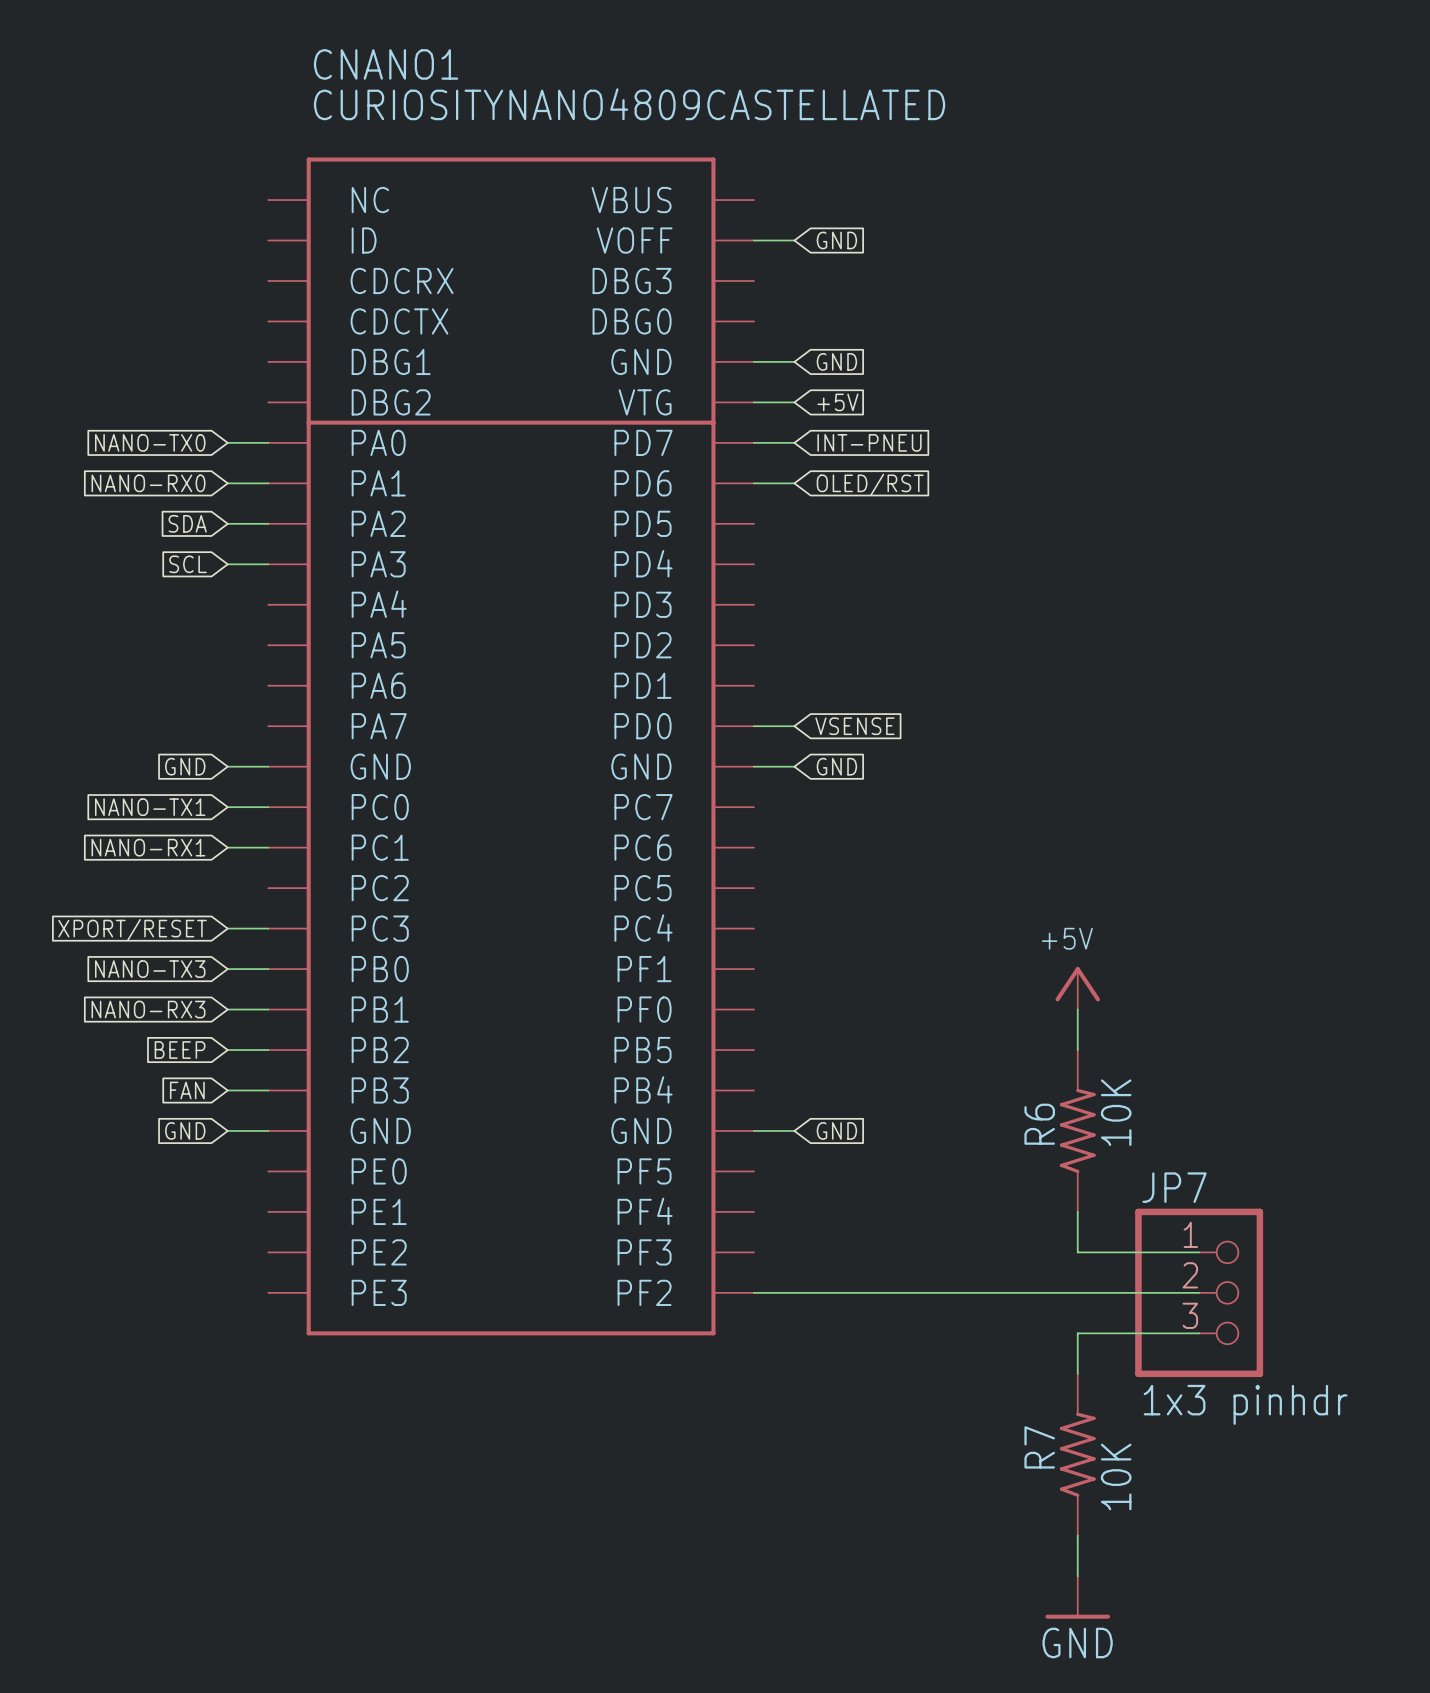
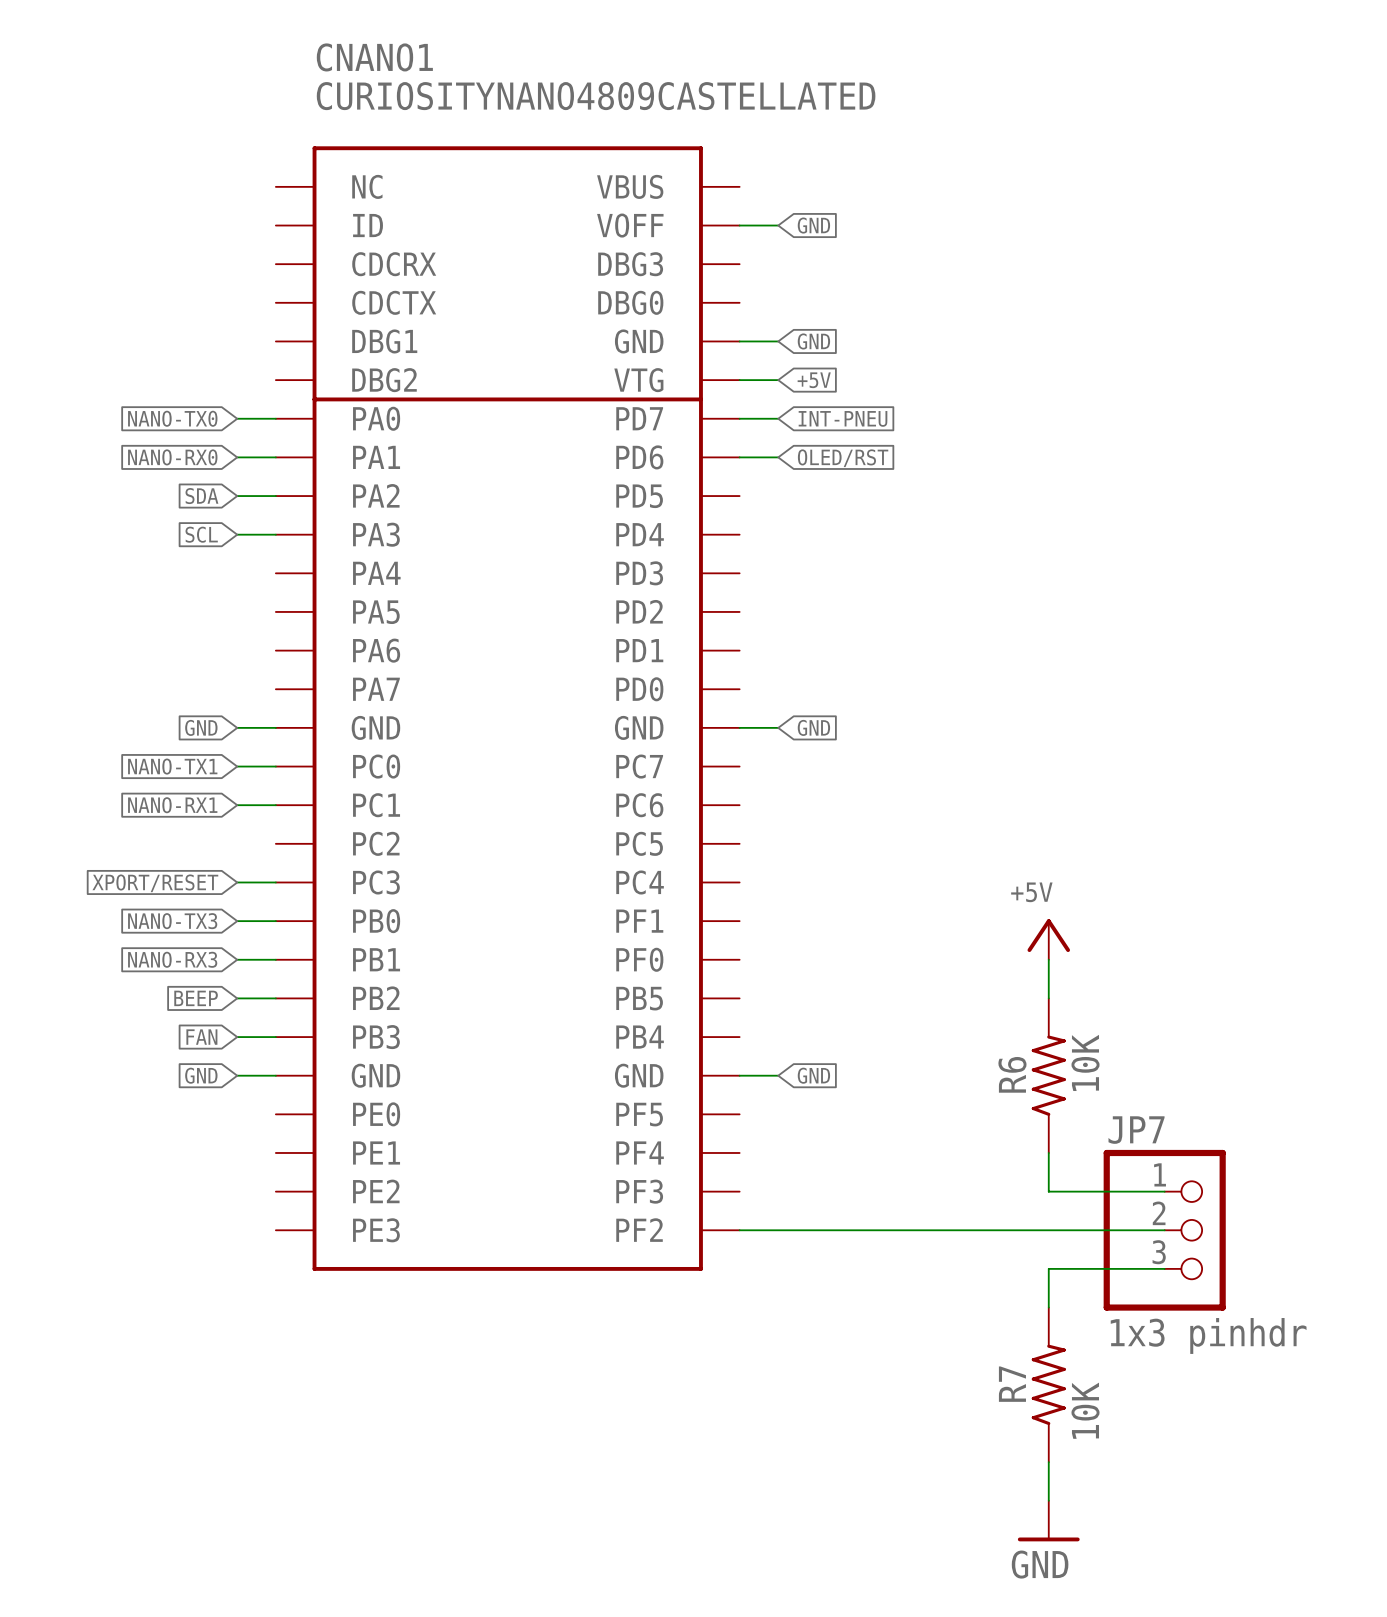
wire: (753, 726) (794, 726) -> none
global label: VSENSE (854, 726) -> none

